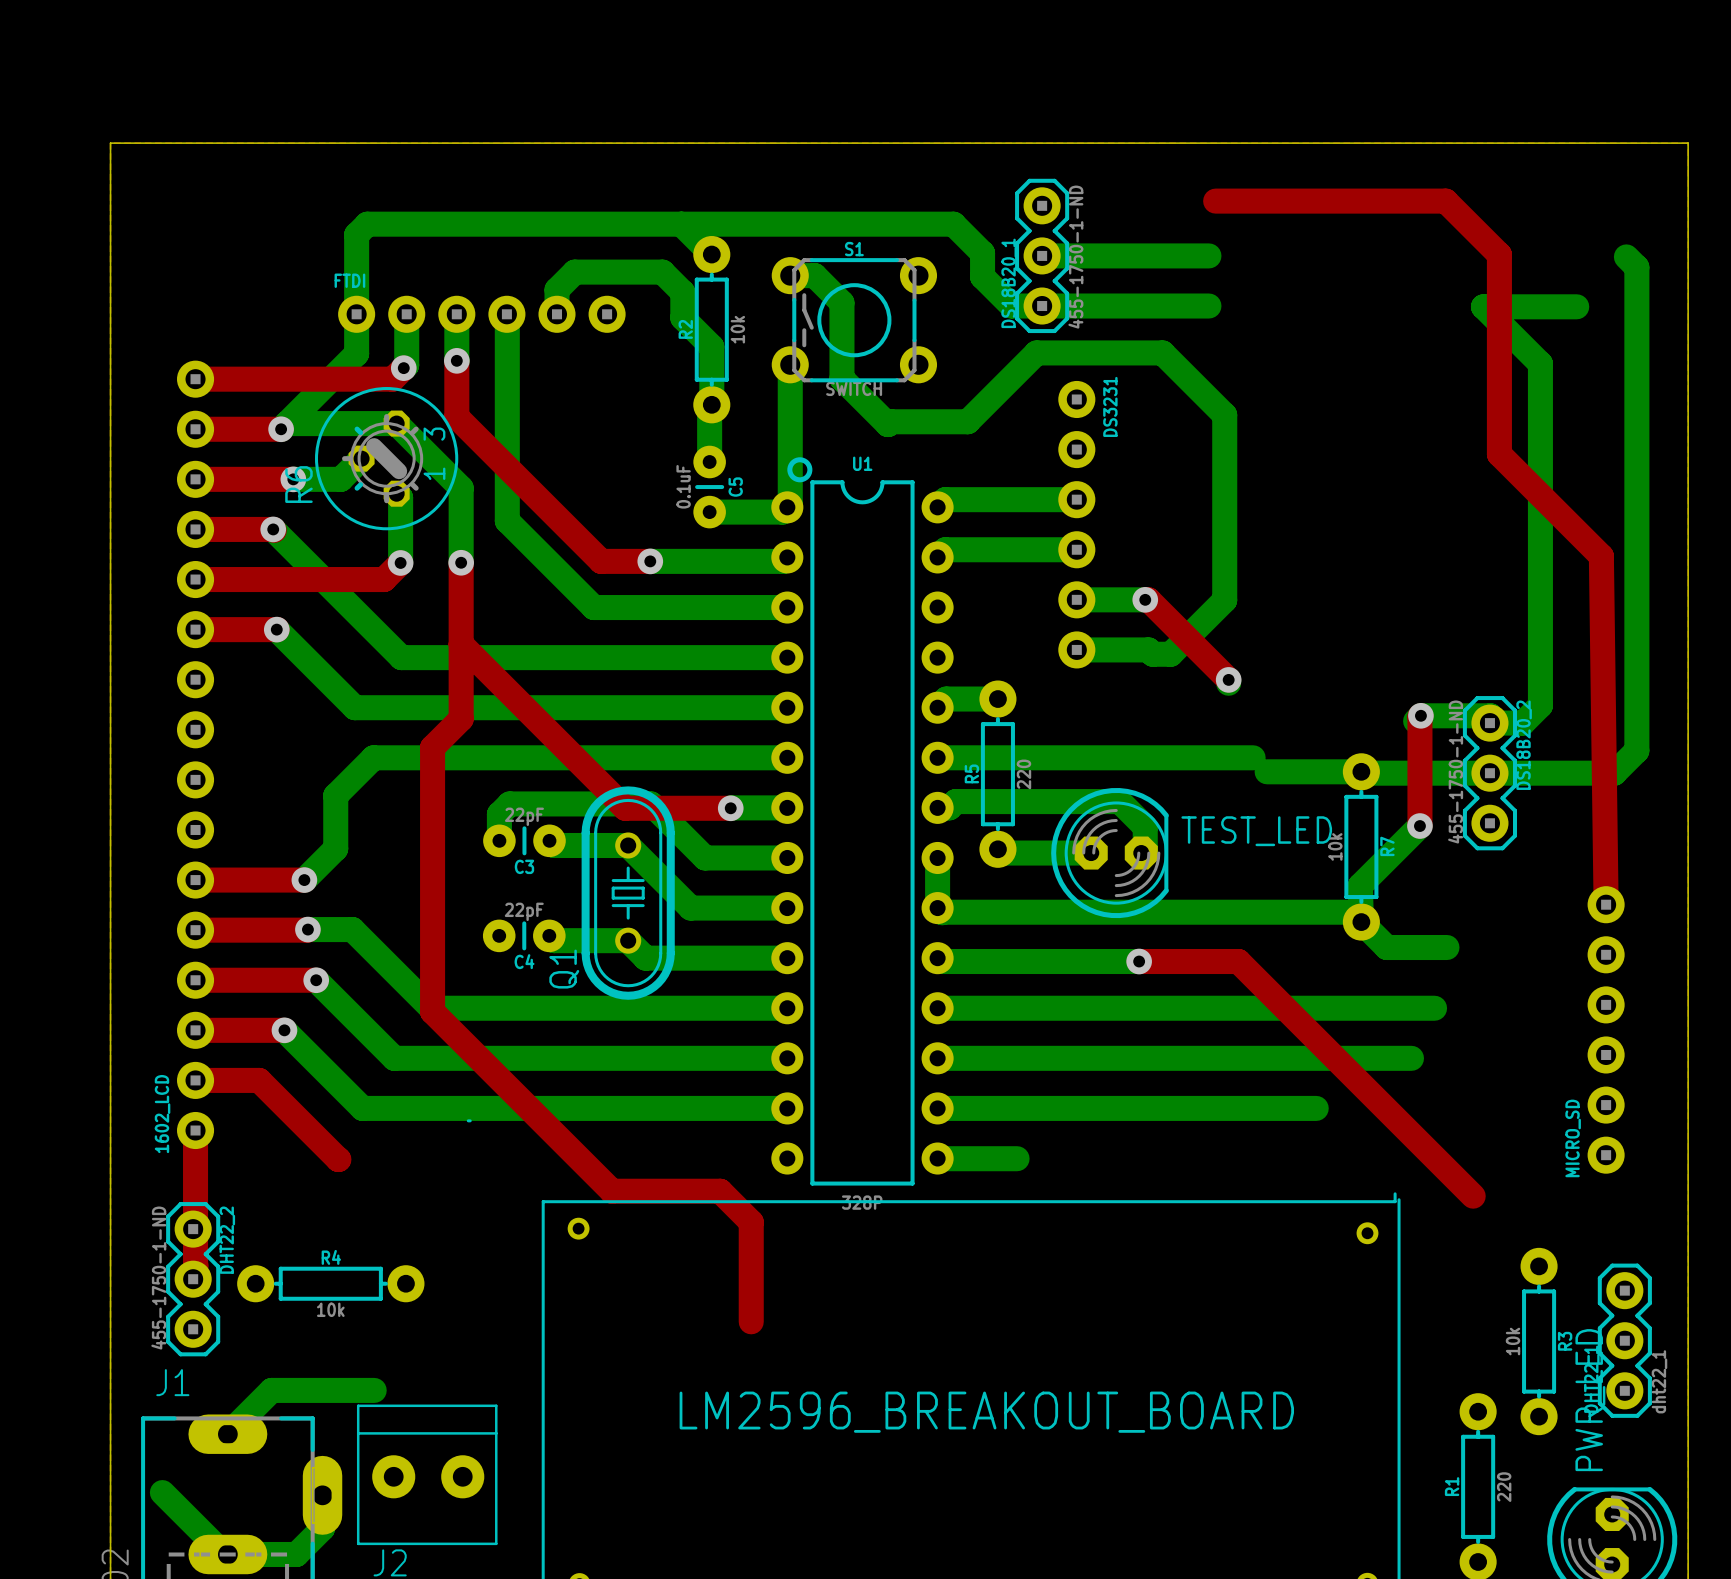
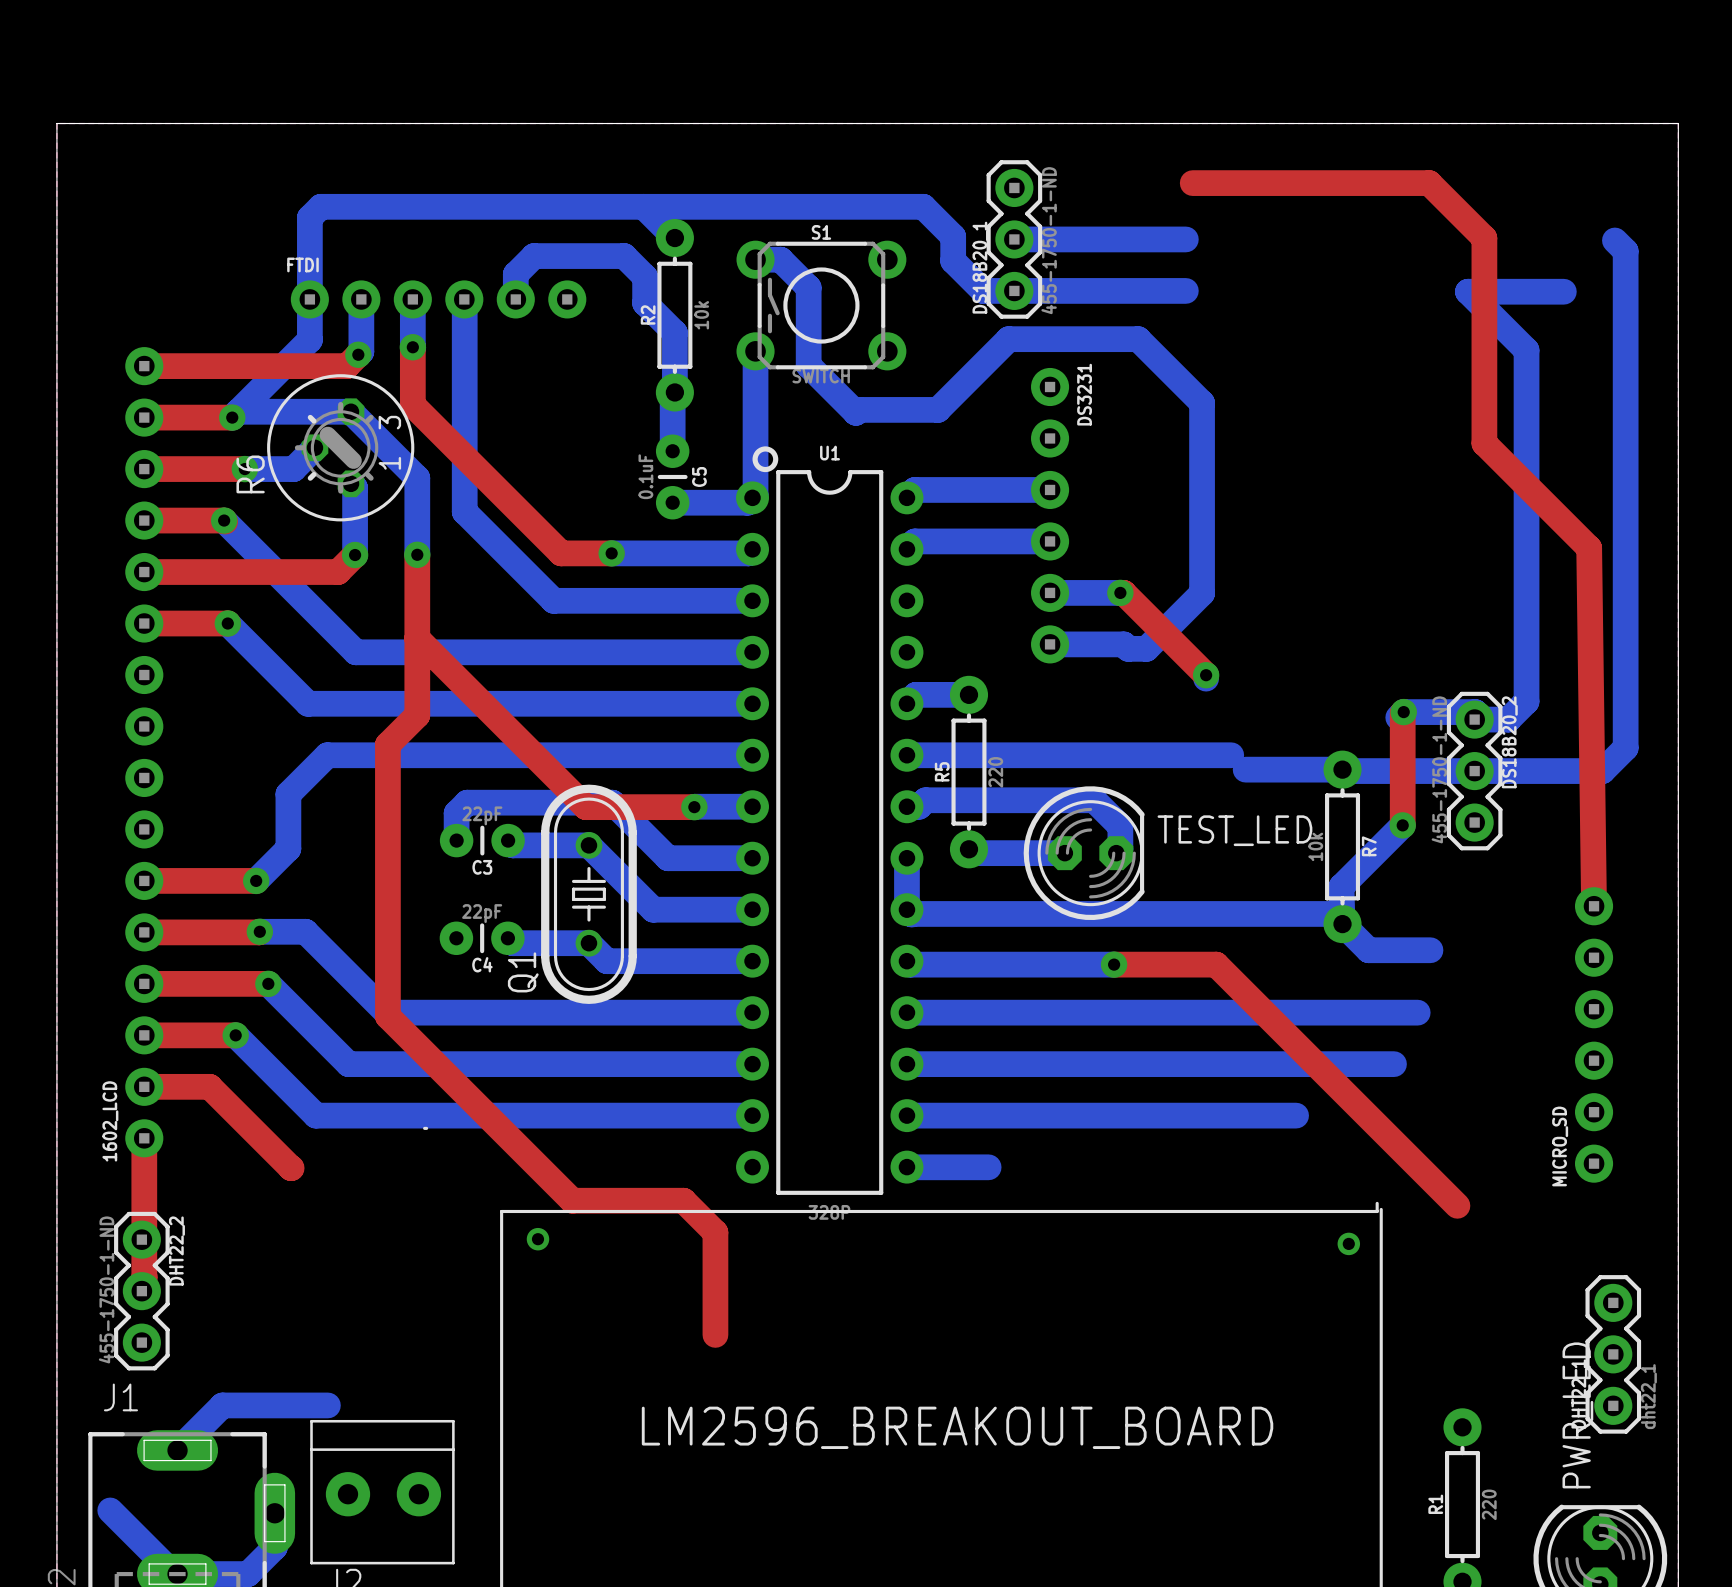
R4: 10k (330, 1283) -> none
R3: 10k (1539, 1341) -> none

